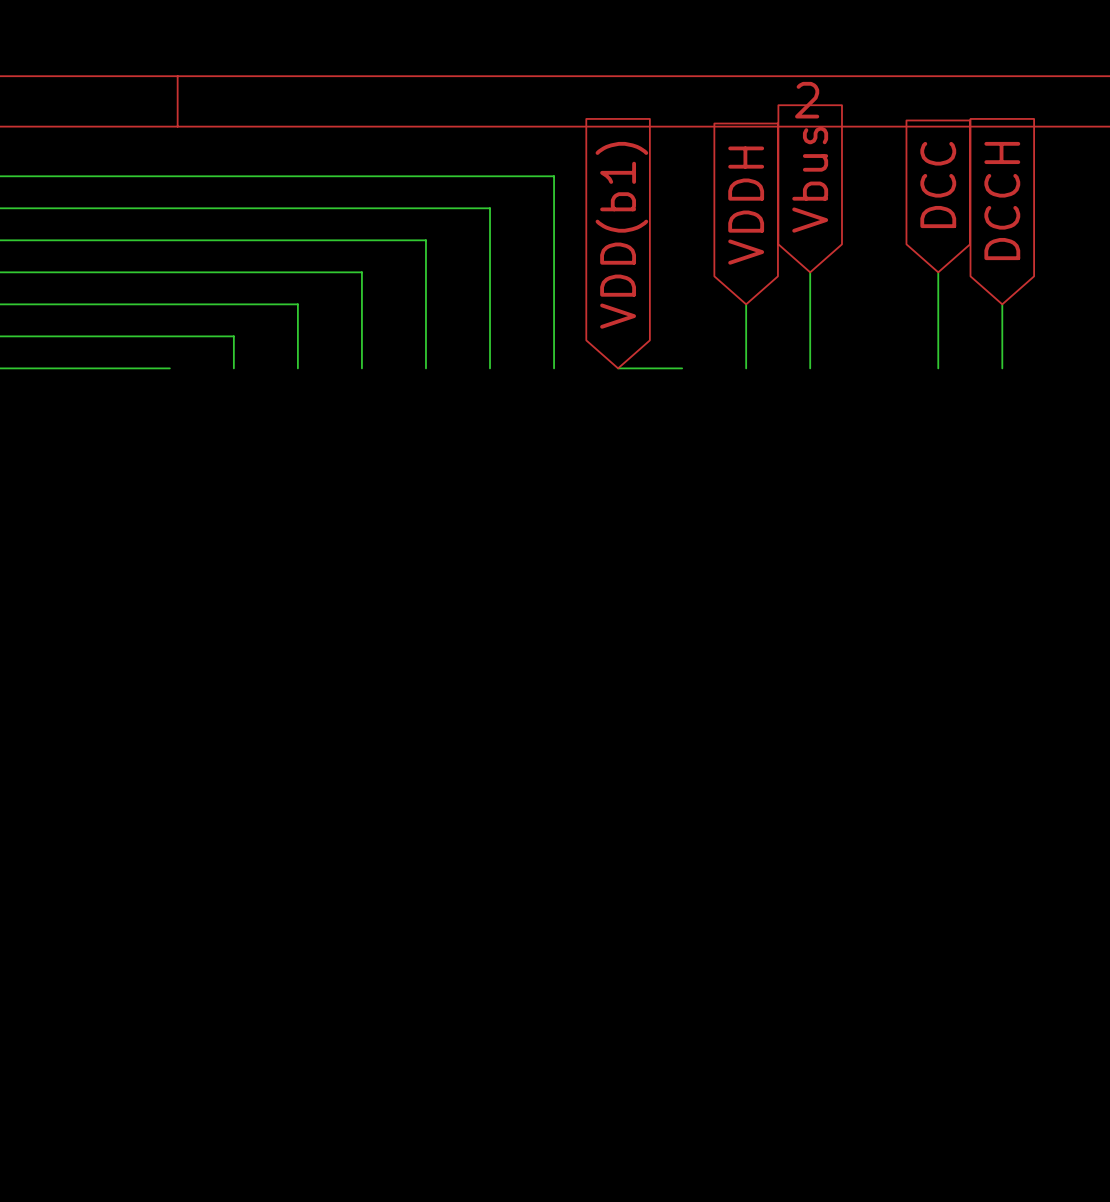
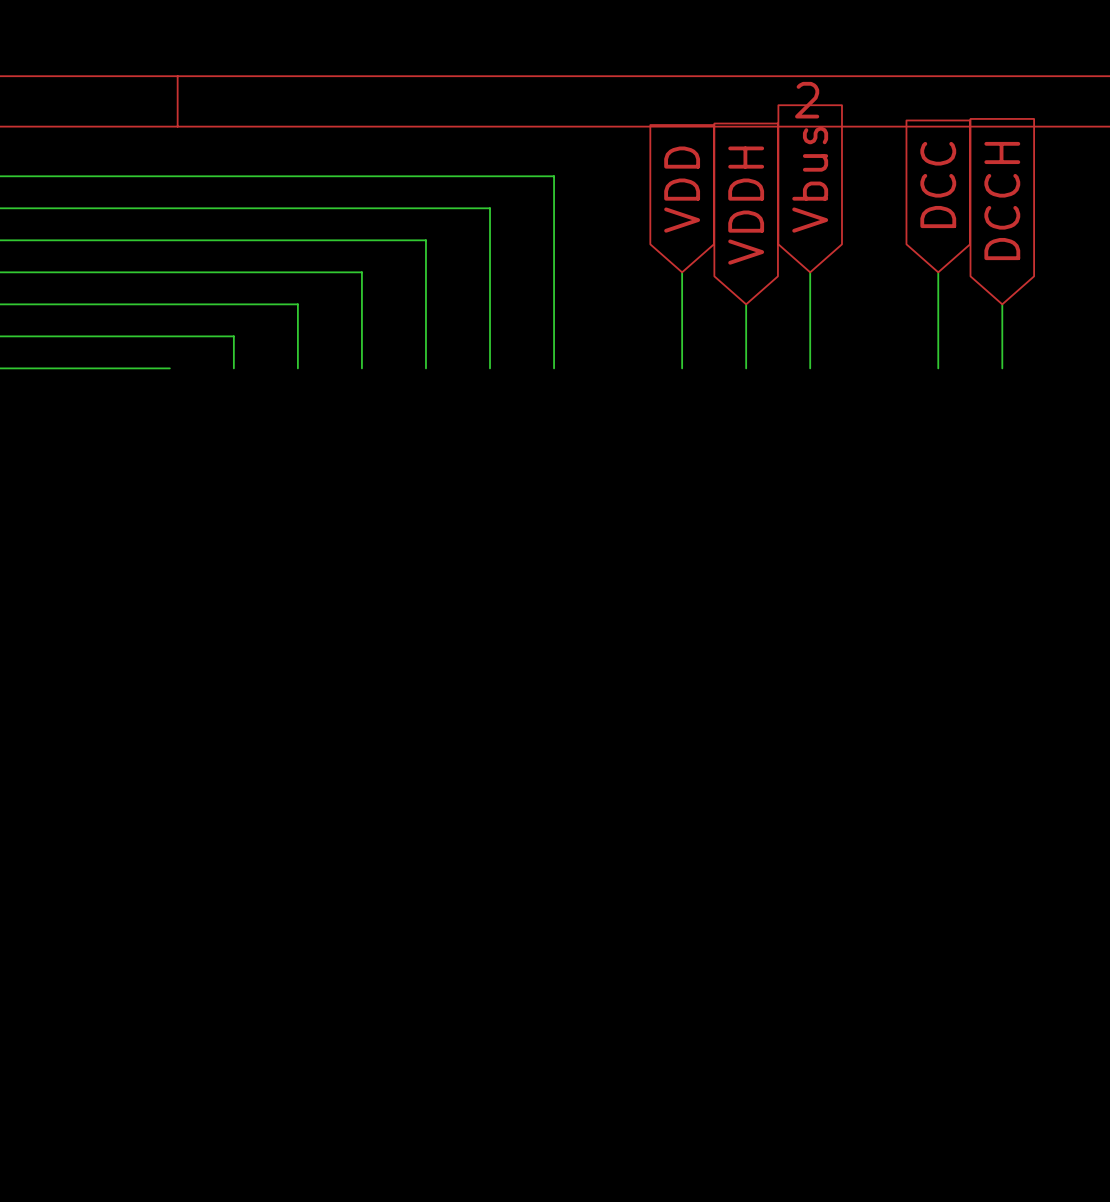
global label: none -> VDD (682, 189)
global label: VDD(b1) (621, 235) -> none
wire: (618, 368) (682, 368) -> (682, 272) (682, 368)

